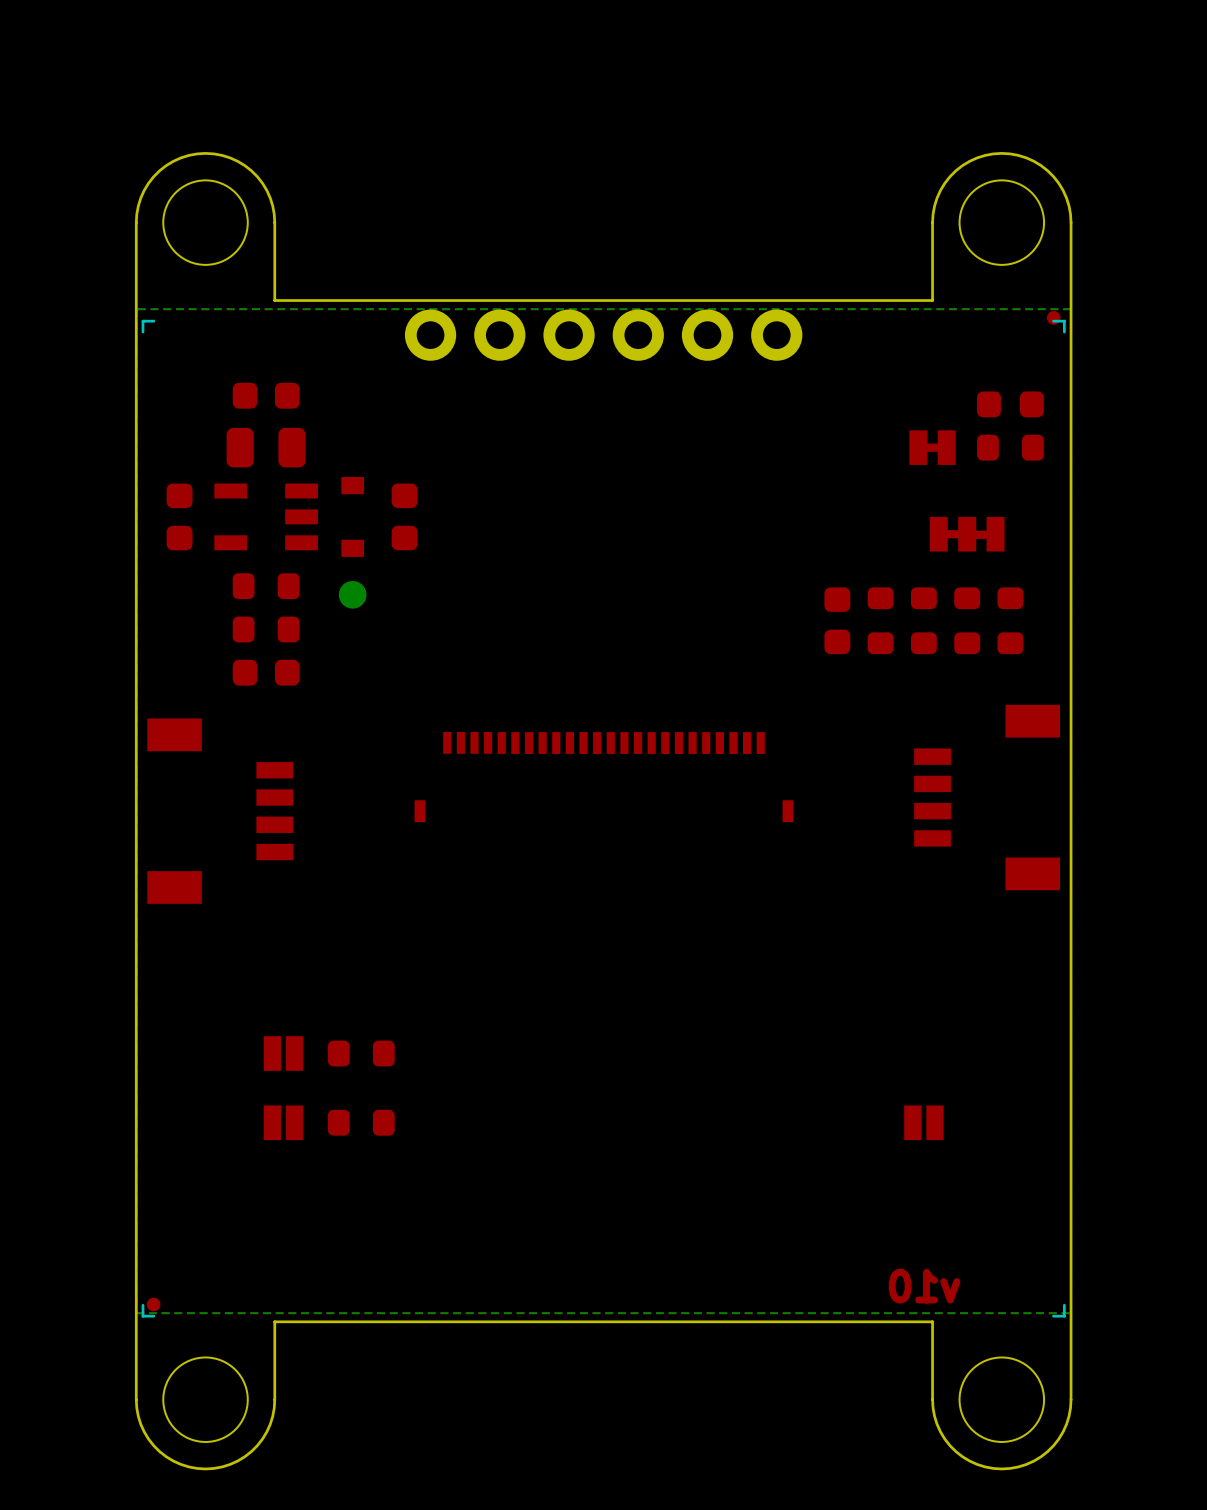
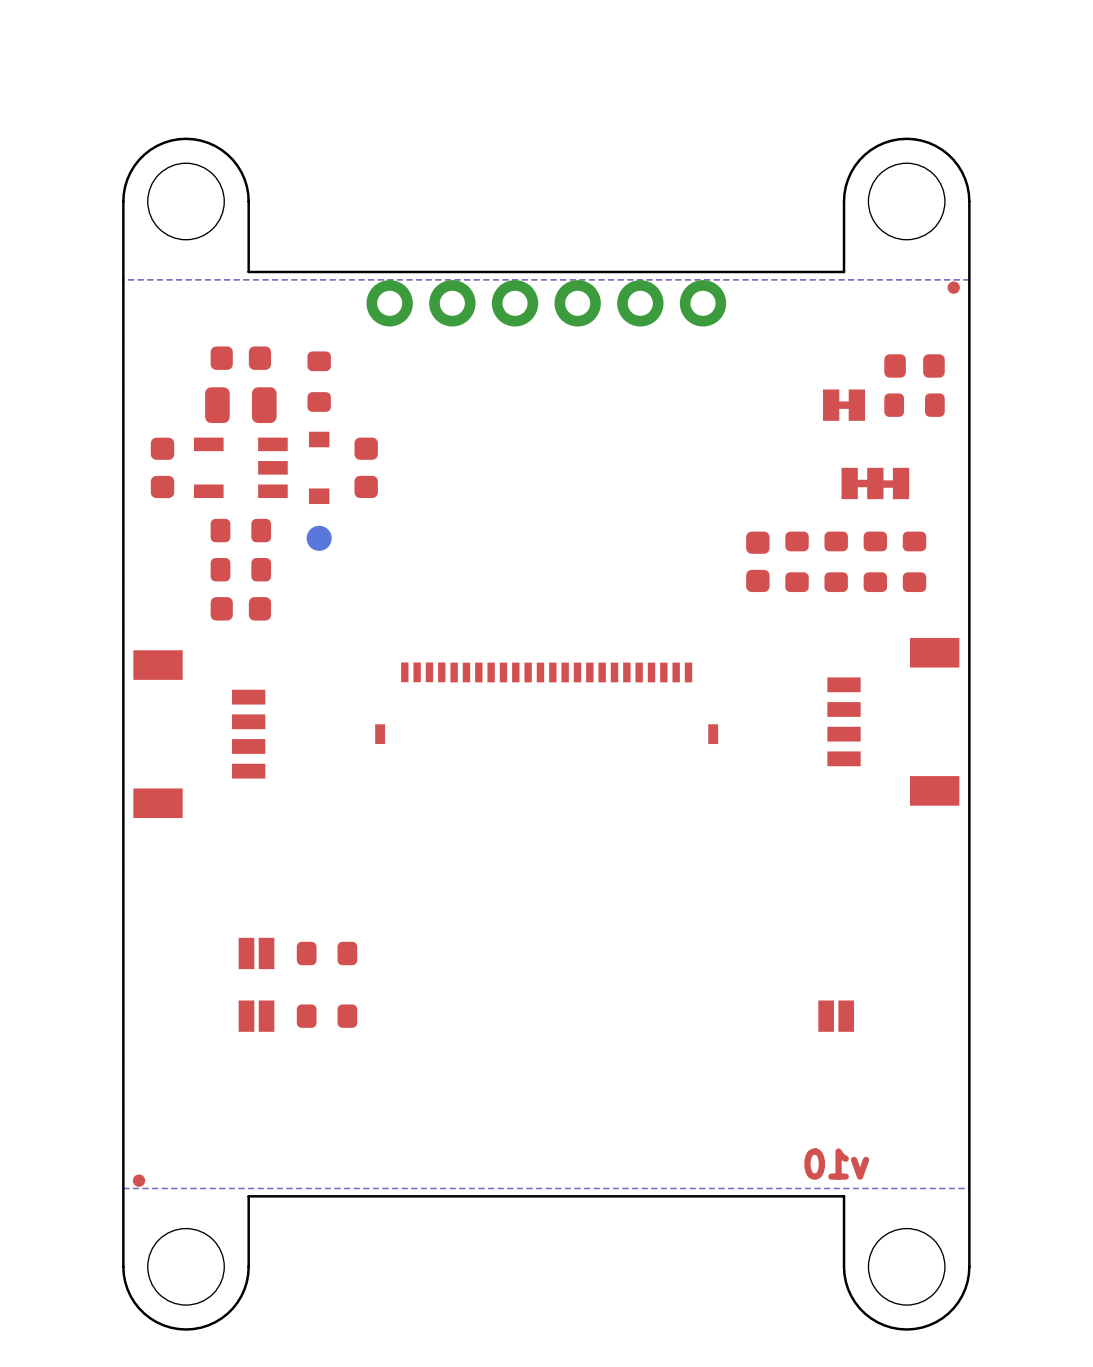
drawing: [141, 319, 1066, 1318] -> none
part: none -> (319, 381)

